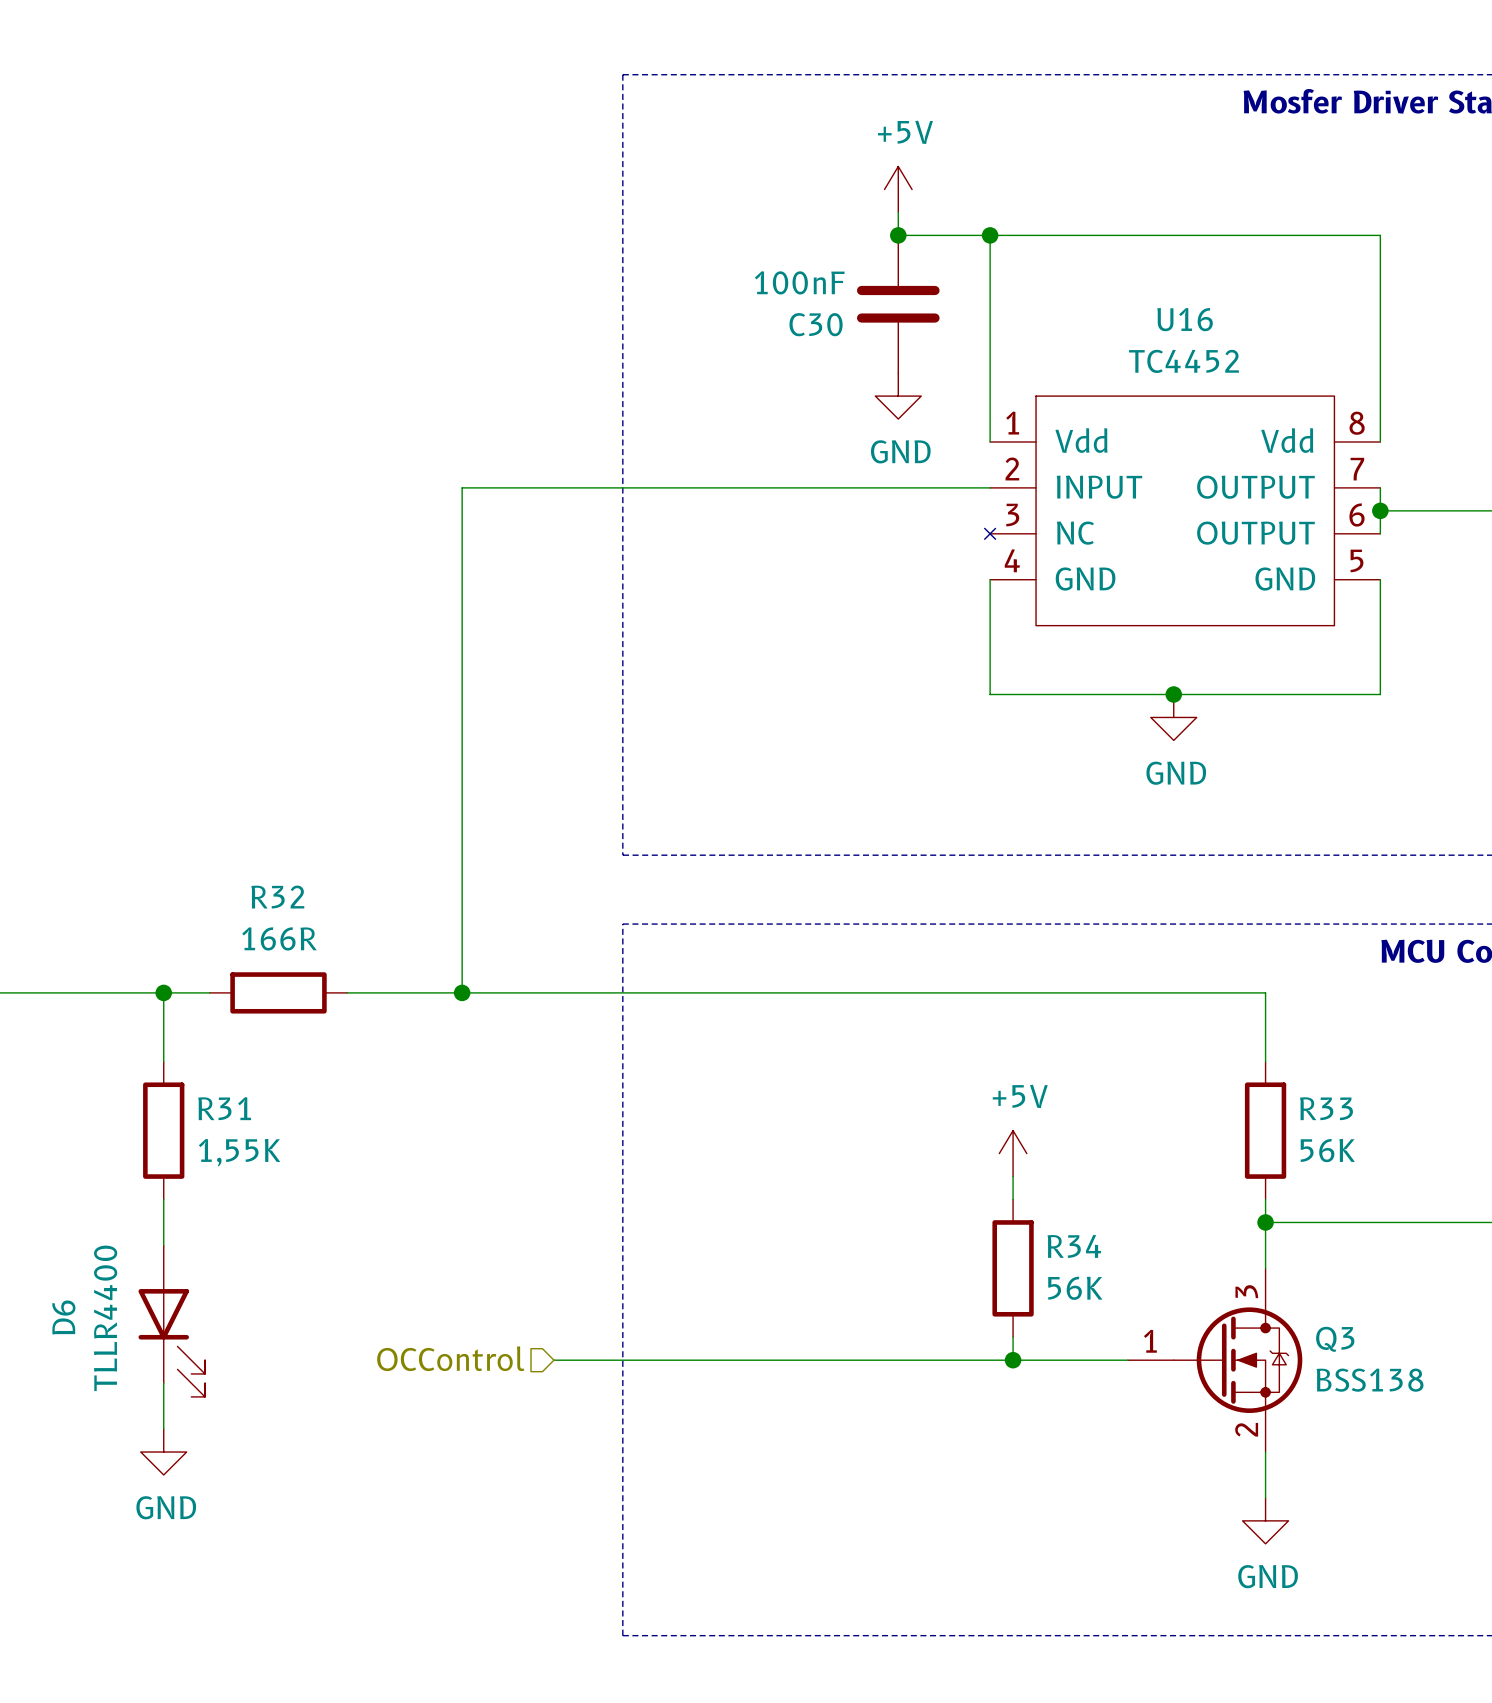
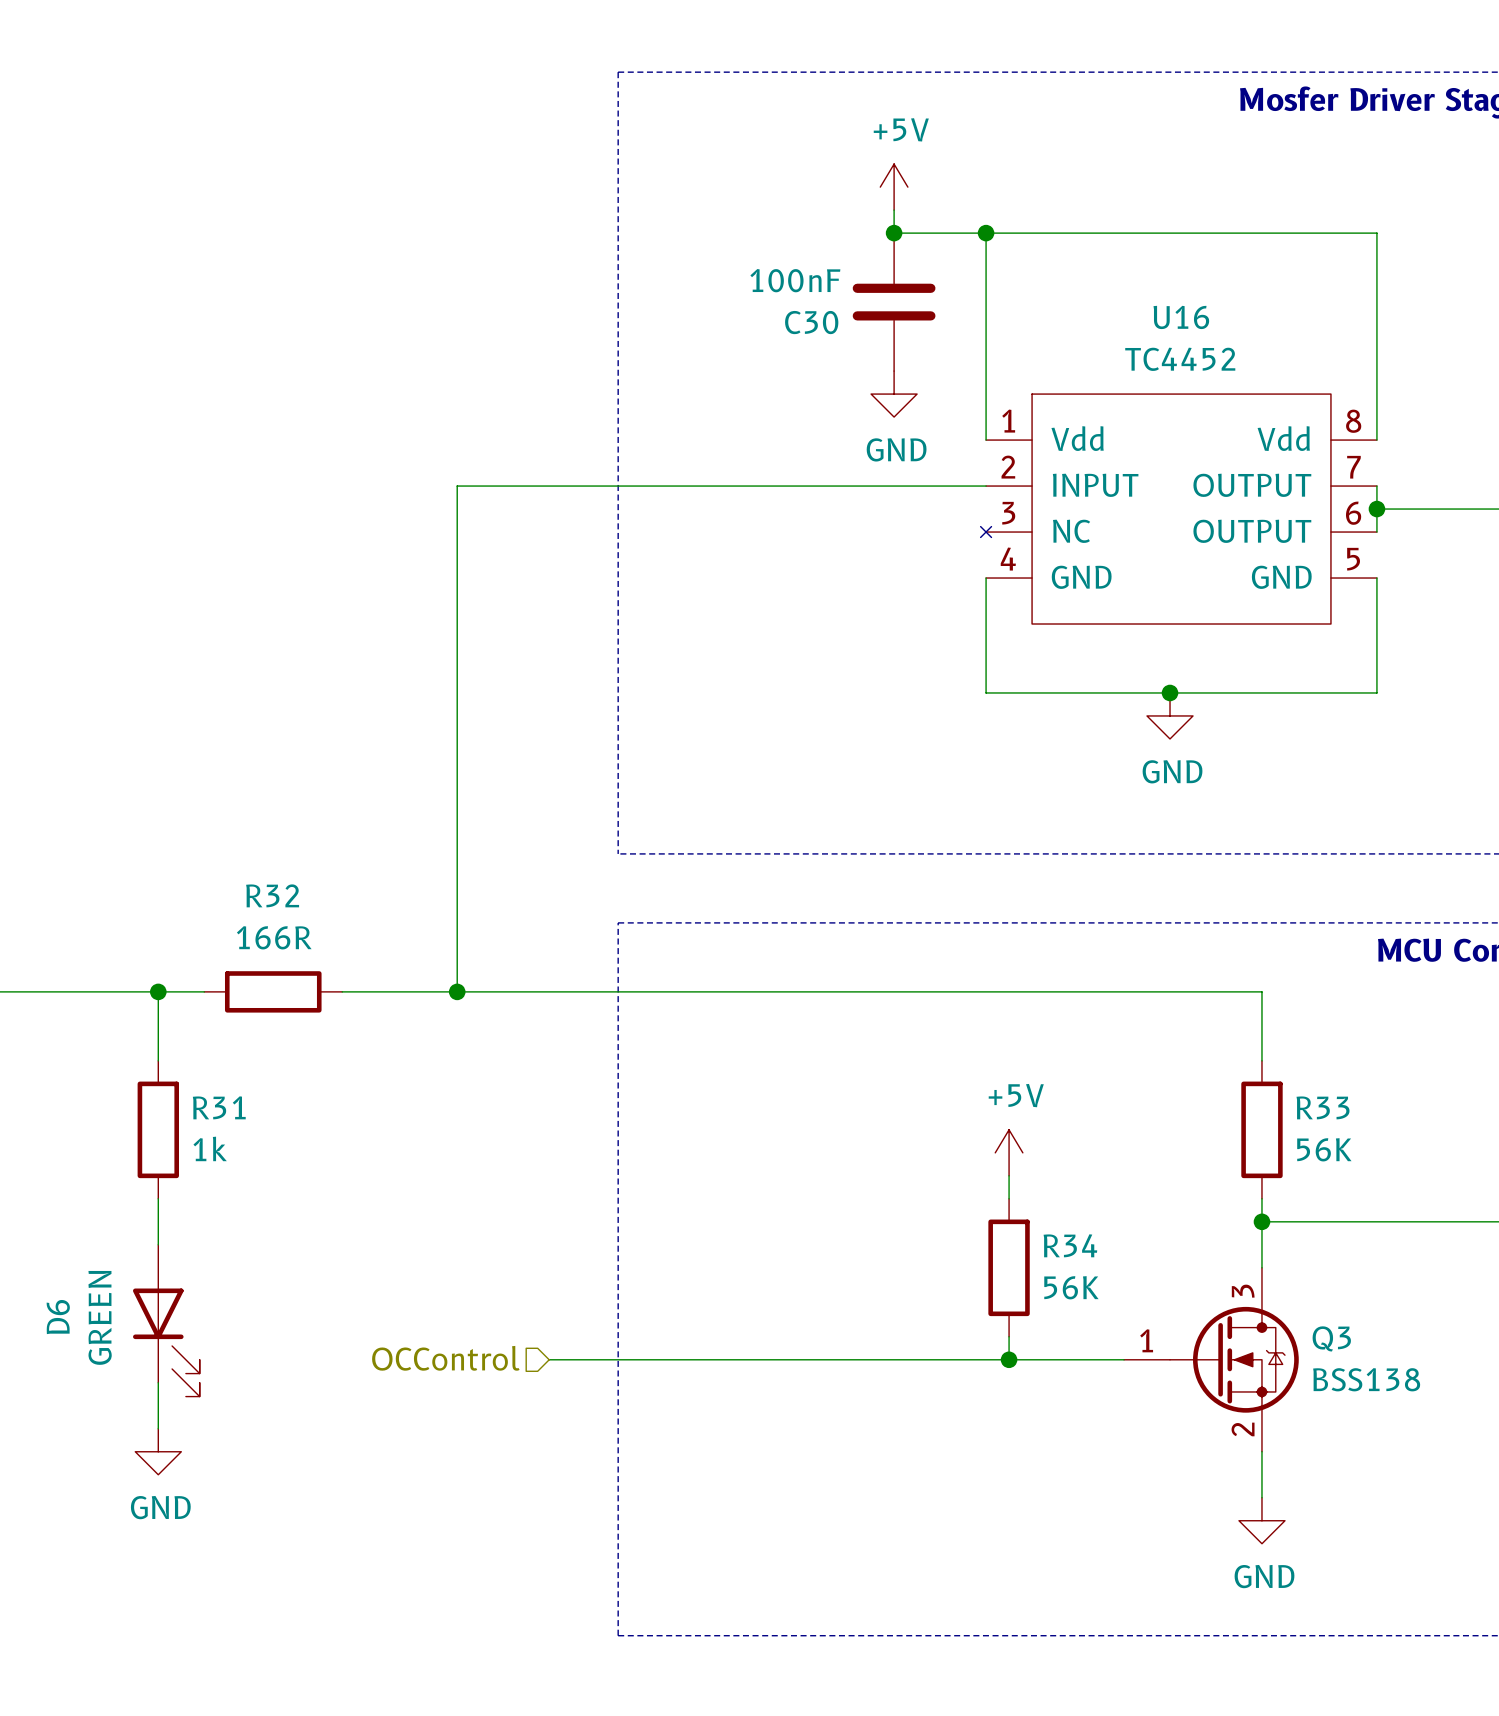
R31 value: 1,55K (239, 1152) -> 1k (210, 1148)
D6 value: TLLR4400 (105, 1318) -> GREEN (100, 1317)

